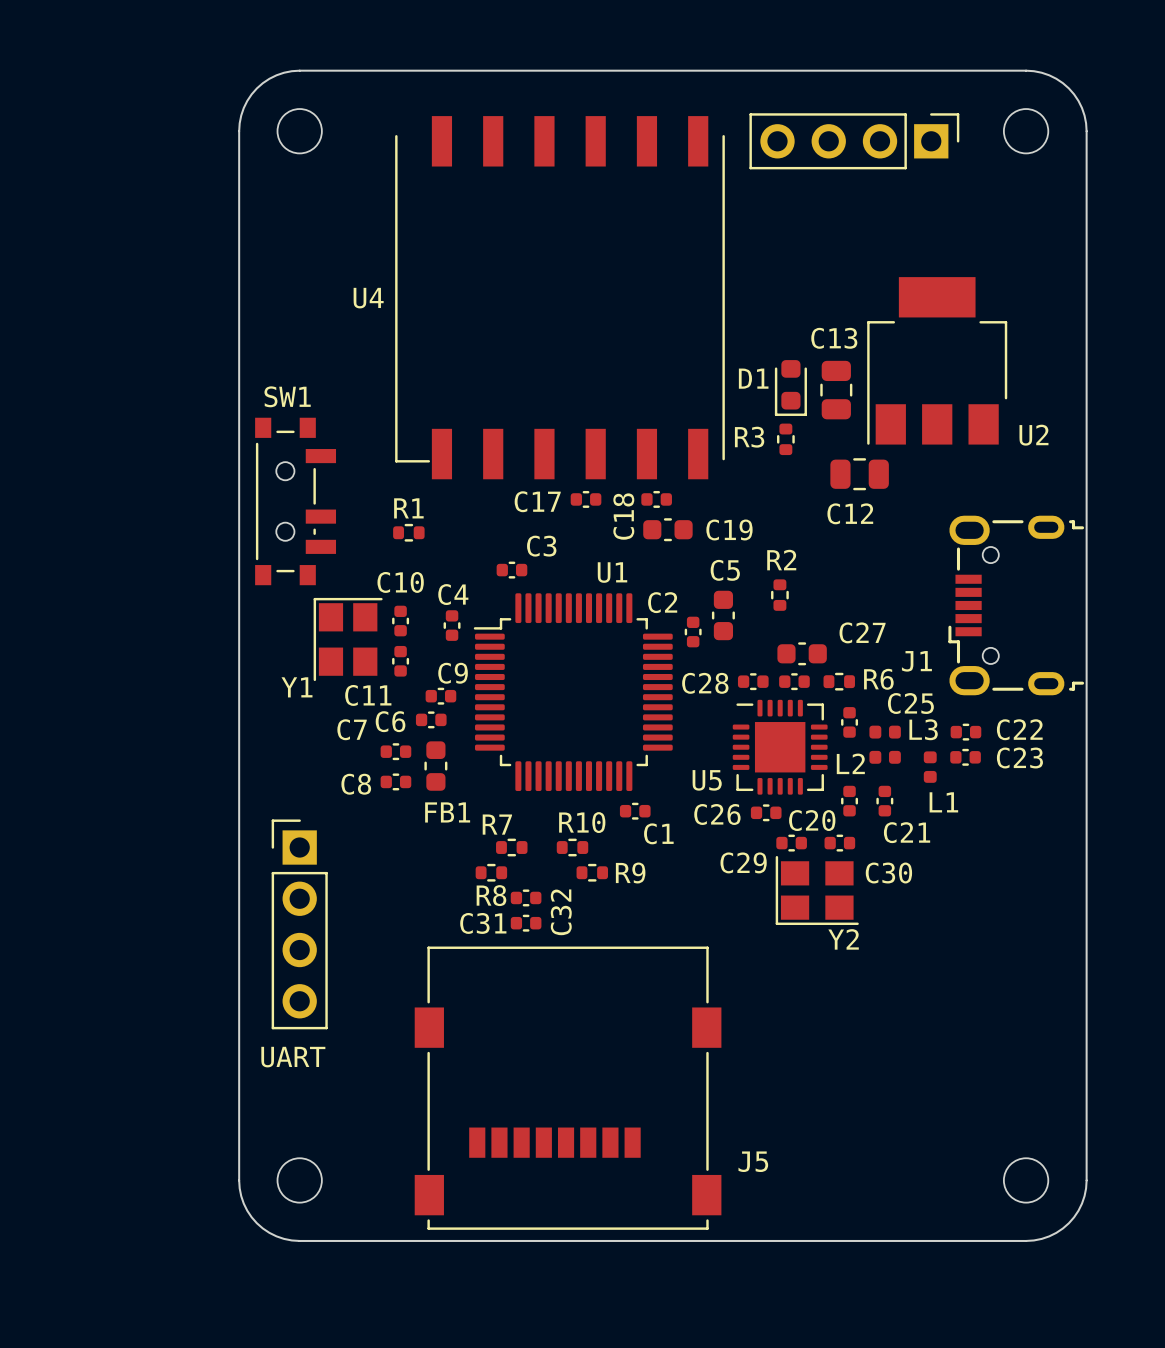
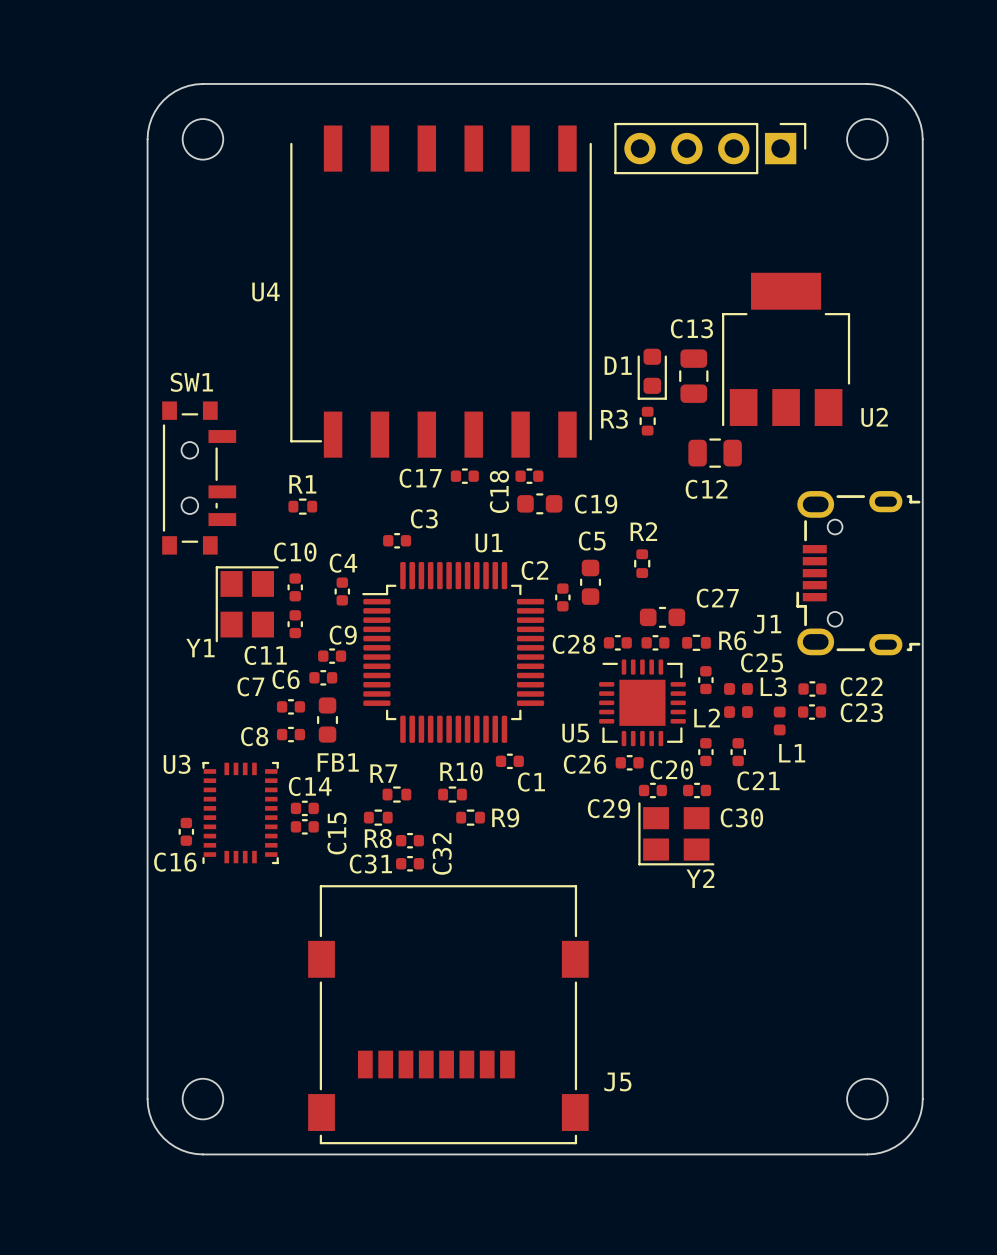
C14: none -> (304, 808)
U3: none -> (240, 813)
C15: none -> (304, 826)
C16: none -> (186, 831)
part: (299, 924) -> none
text: UART (293, 1057) -> none

